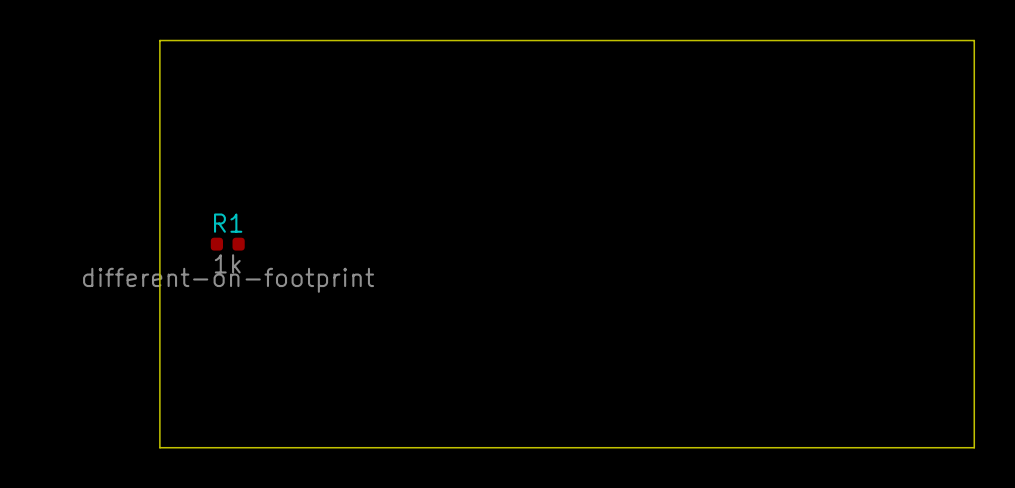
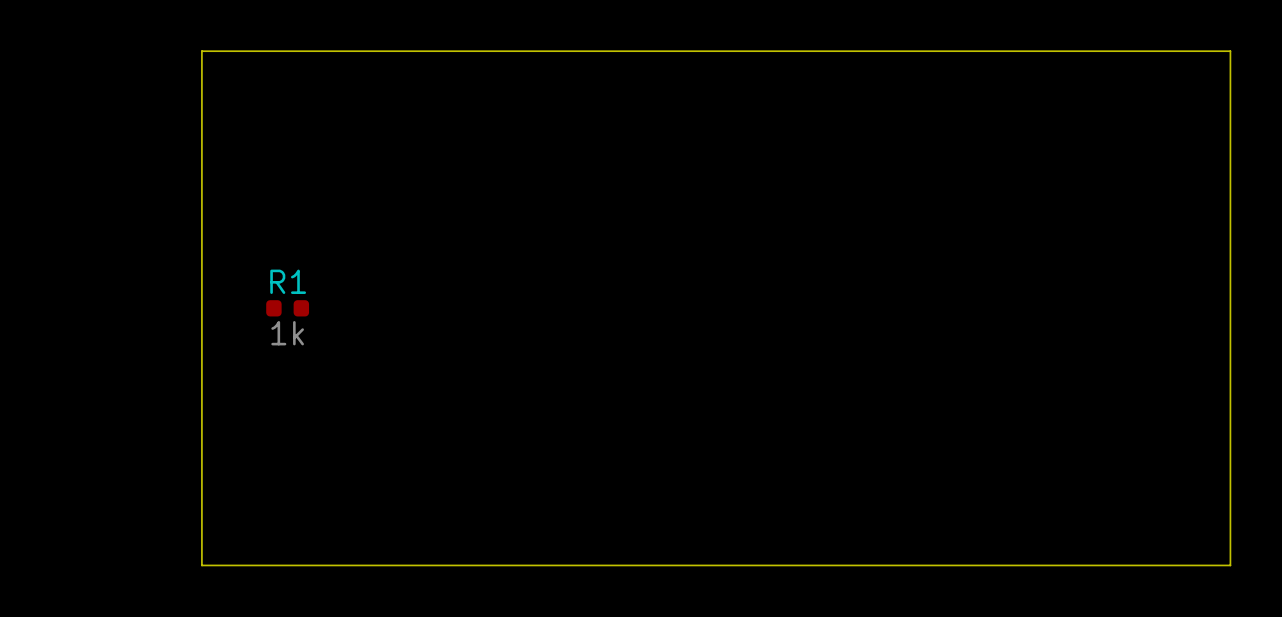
R1 text: different-on-footprint (228, 280) -> none

